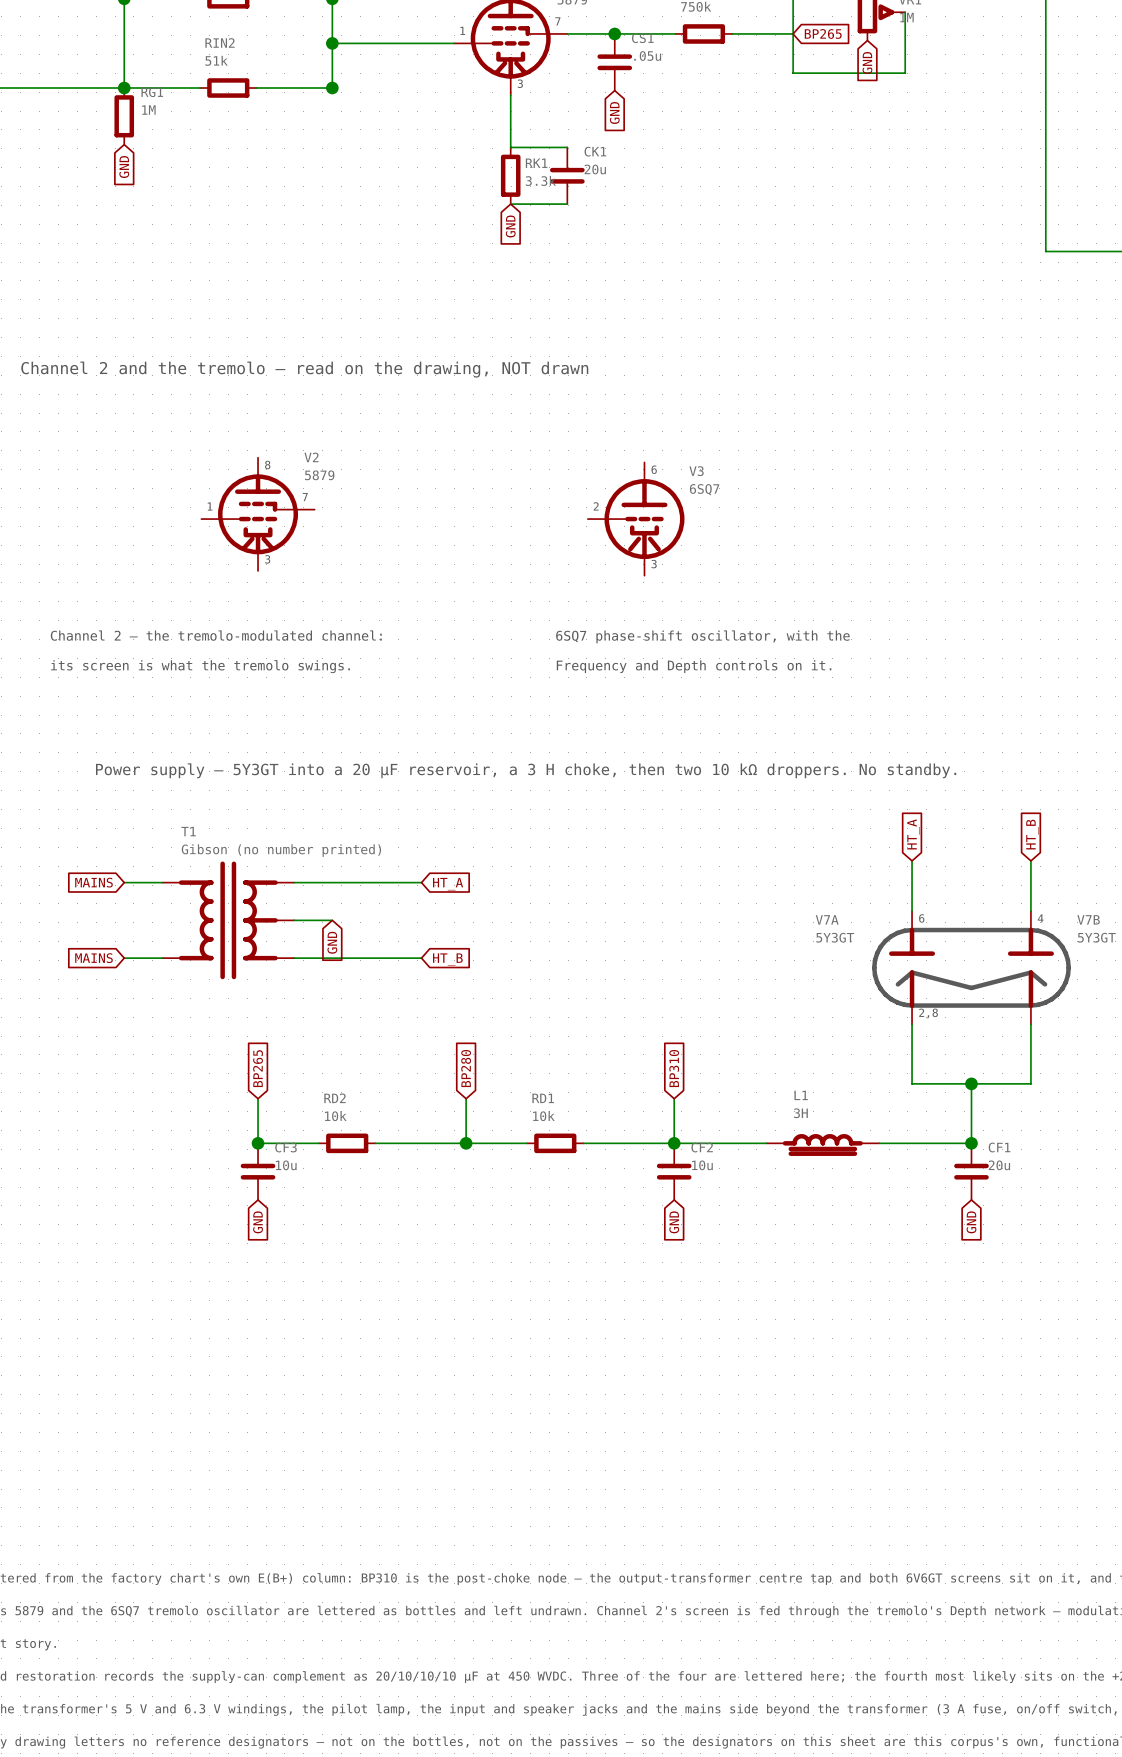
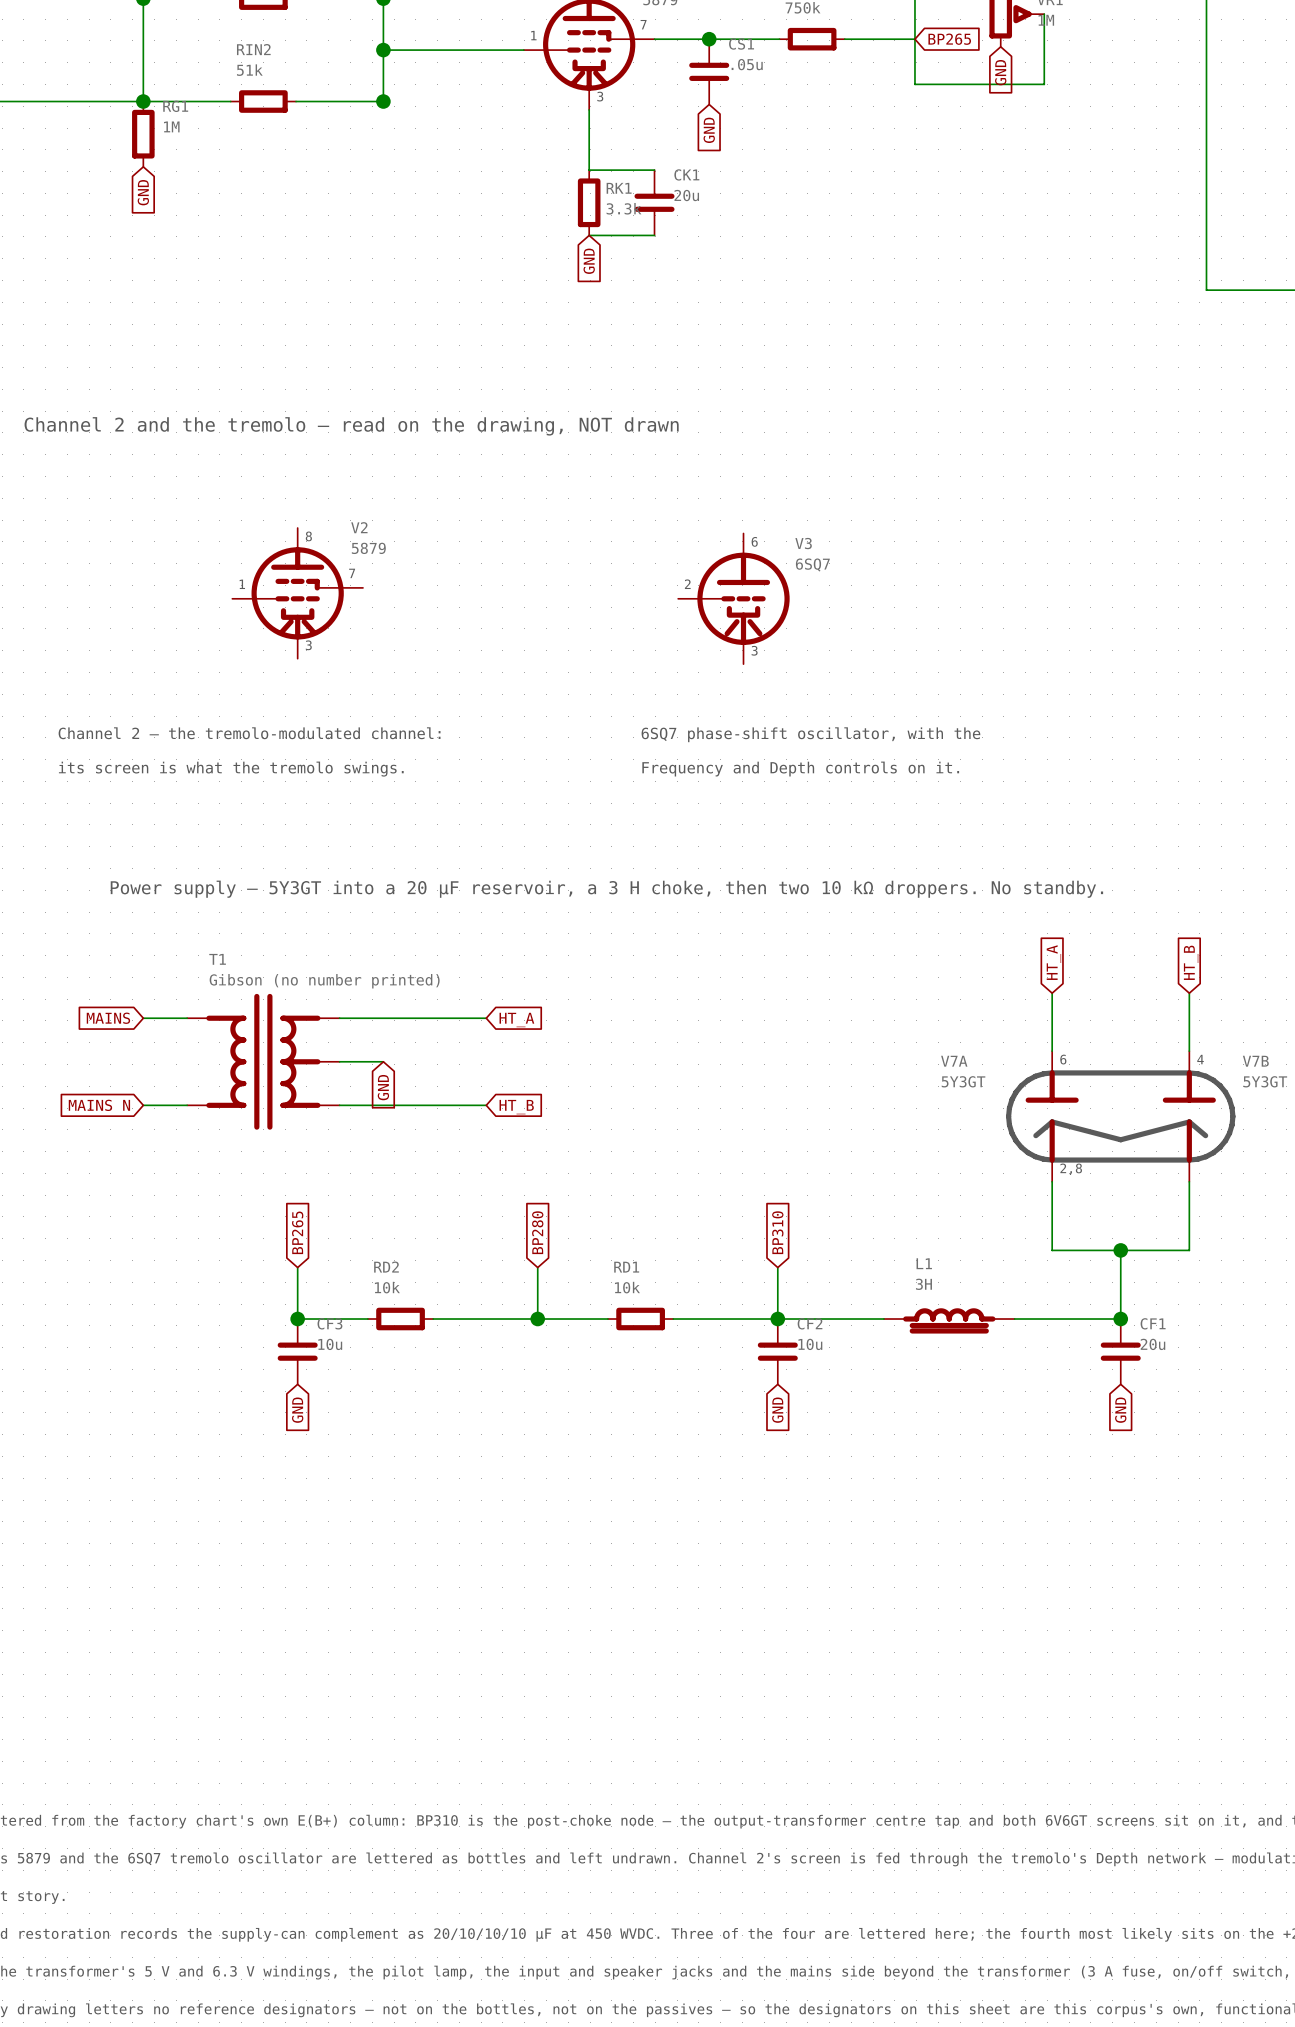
global label: MAINS (93, 958) -> MAINS N (99, 1105)

